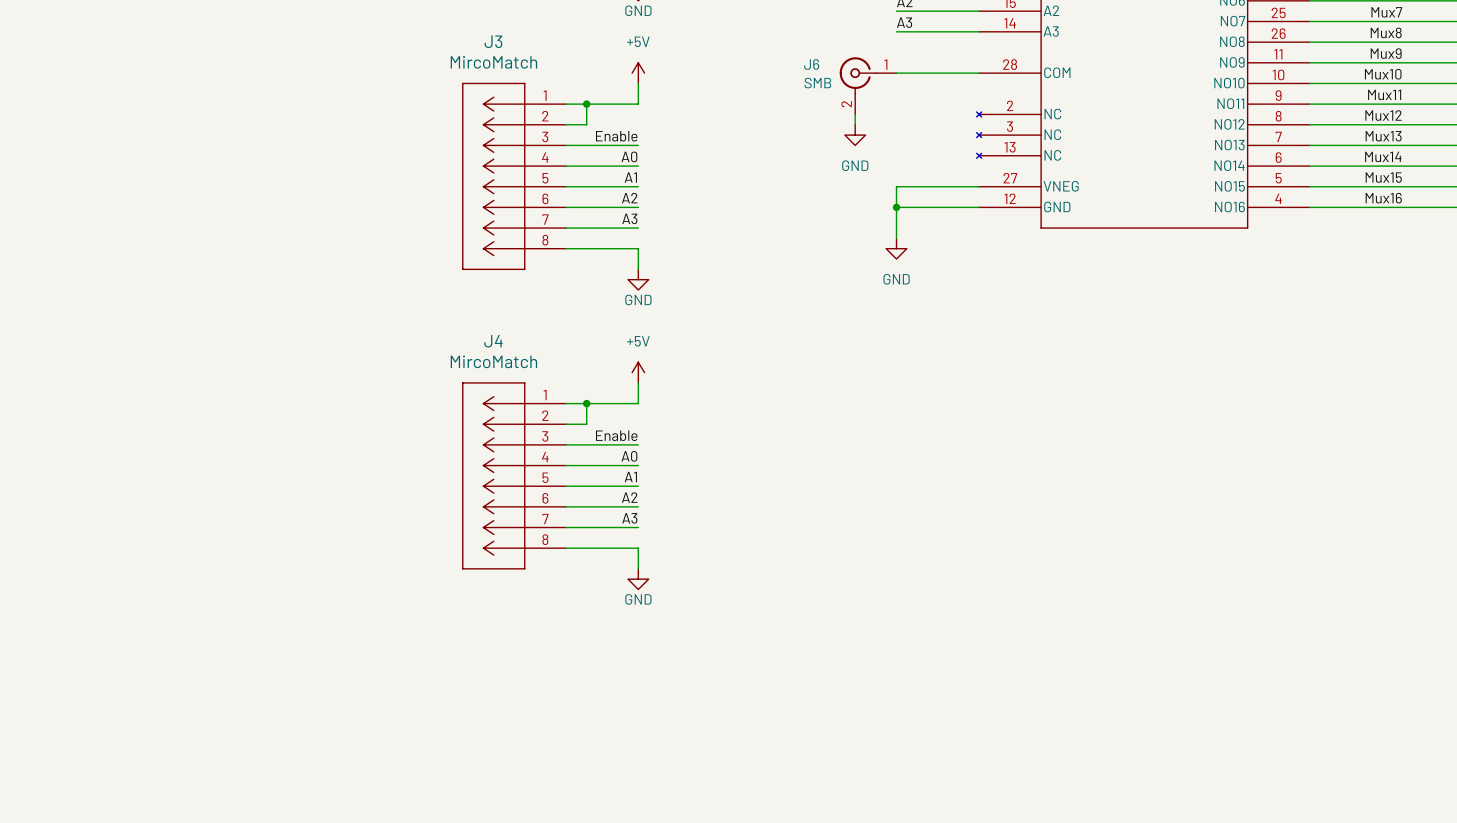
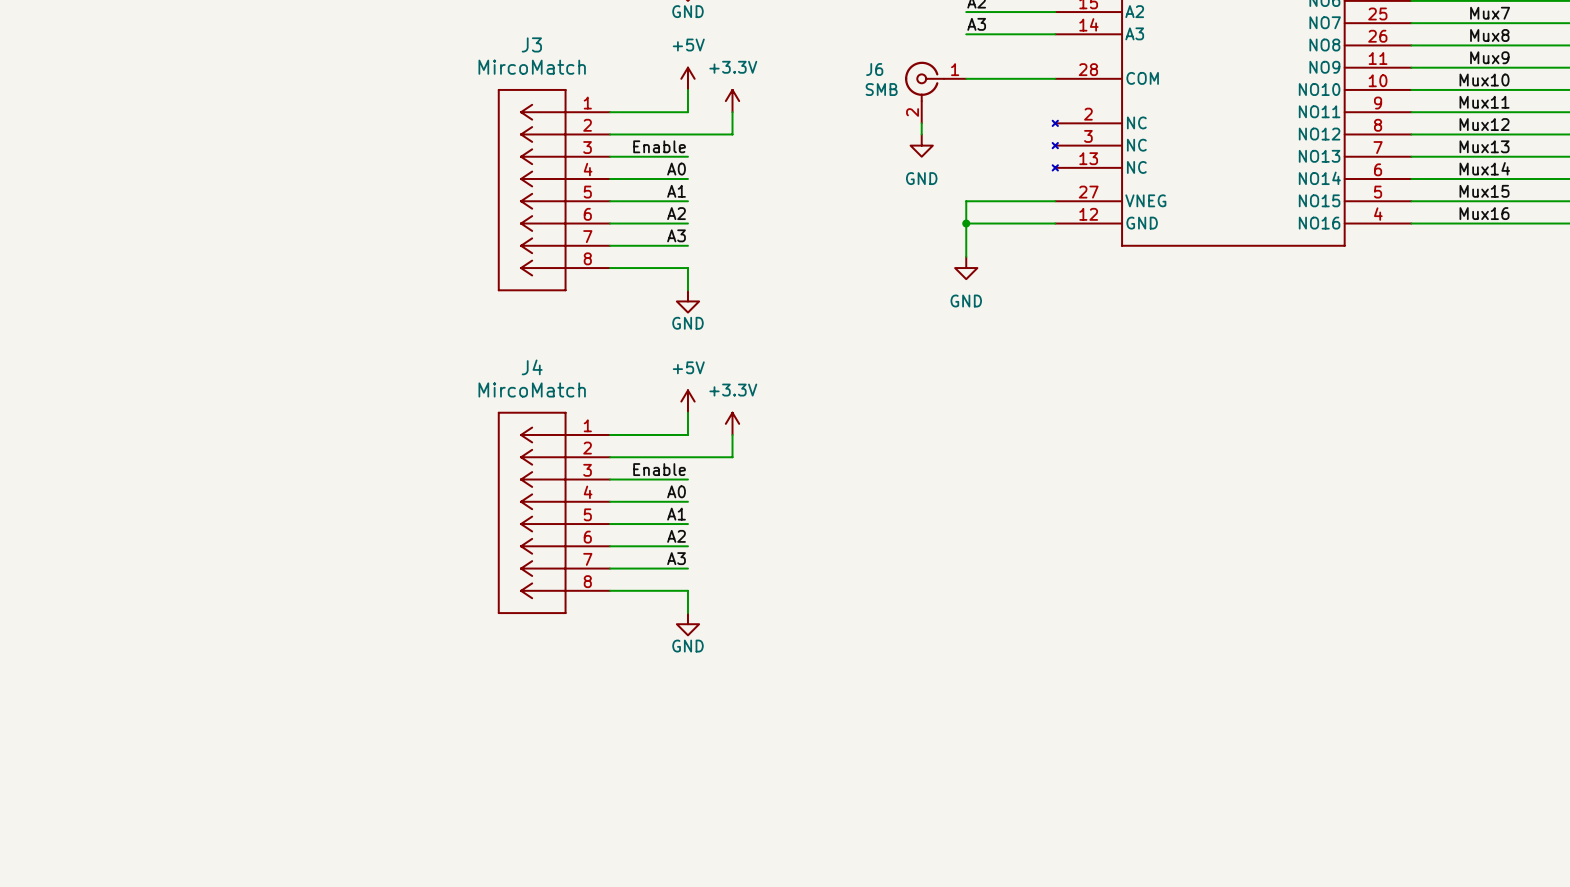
power symbol: none -> +3.3V (732, 101)
wire: (586, 104) (586, 124) -> (732, 112) (732, 134) (632, 134)
junction: (586, 104) -> none
power symbol: none -> +3.3V (732, 423)
wire: (586, 403) (586, 424) -> (732, 434) (732, 457) (632, 457)
junction: (586, 403) -> none

